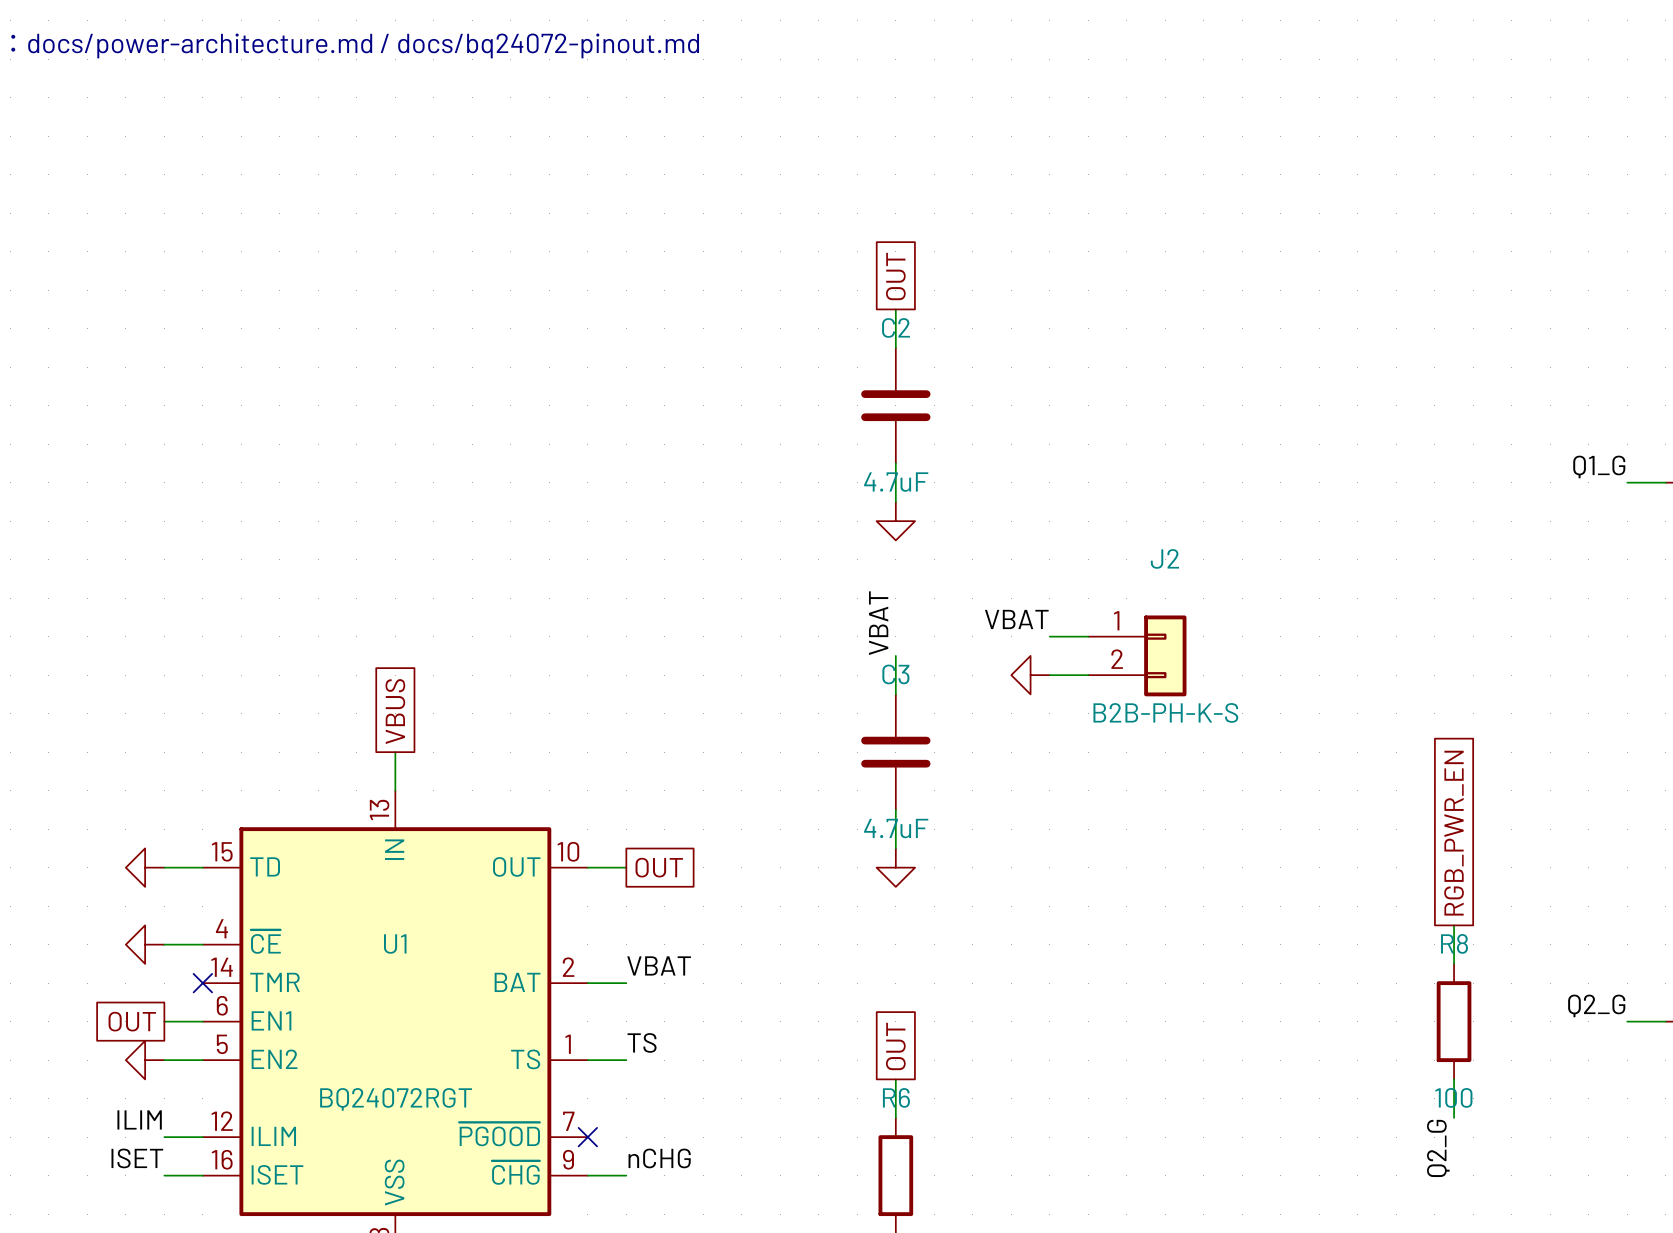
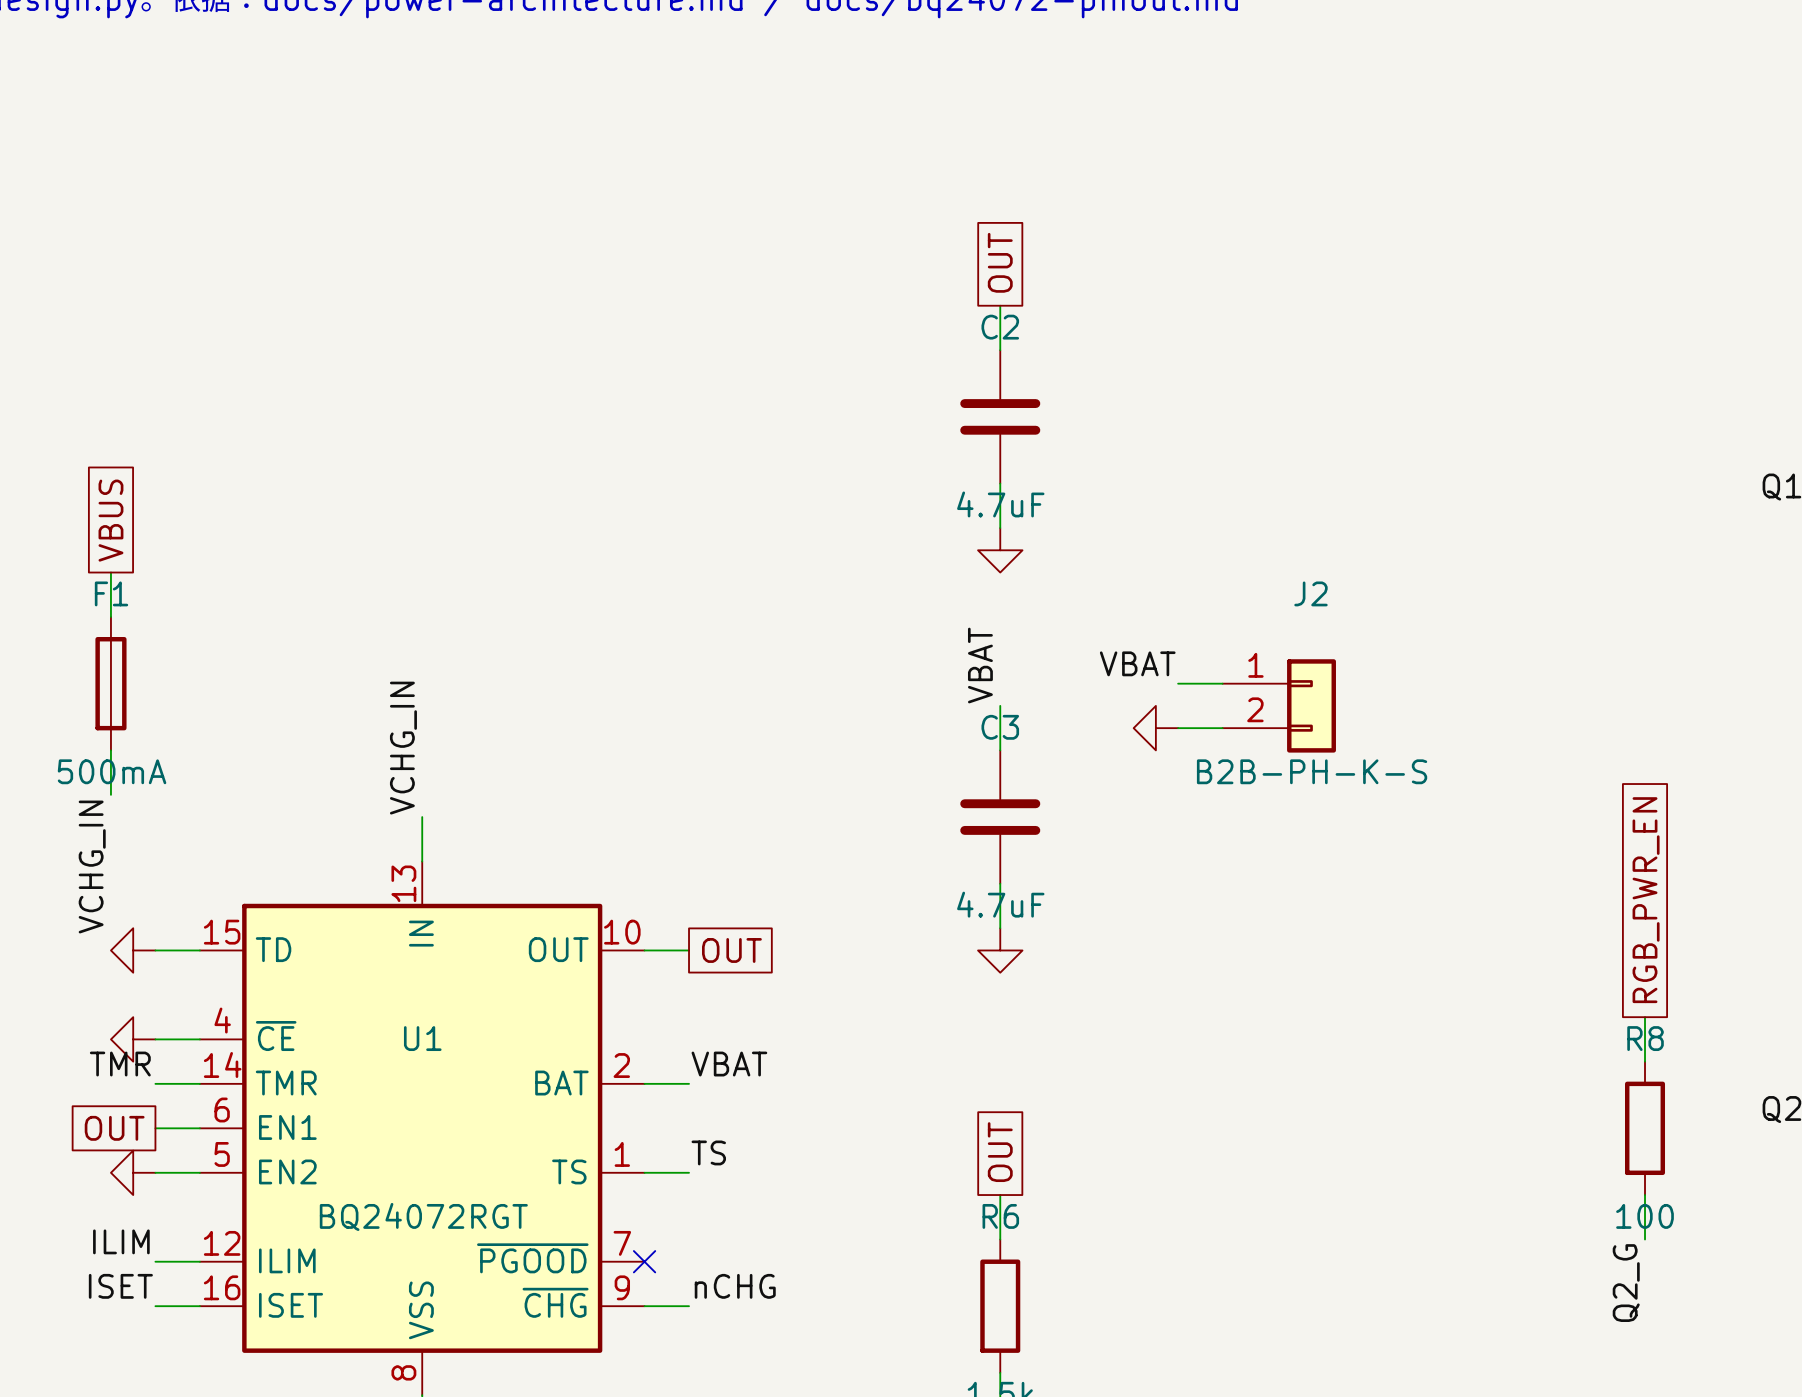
wire: none -> (110, 572) (110, 616)
F1: none -> 500mA (110, 683)
wire: none -> (110, 750) (110, 794)
label: none -> VCHG_IN (403, 748)
global label position: VBUS (395, 711) -> VBUS (110, 520)
label: none -> VCHG_IN (92, 867)
label: none -> TMR (120, 1064)
wire: none -> (155, 1083) (199, 1083)
no-connect mark: (202, 983) -> none

